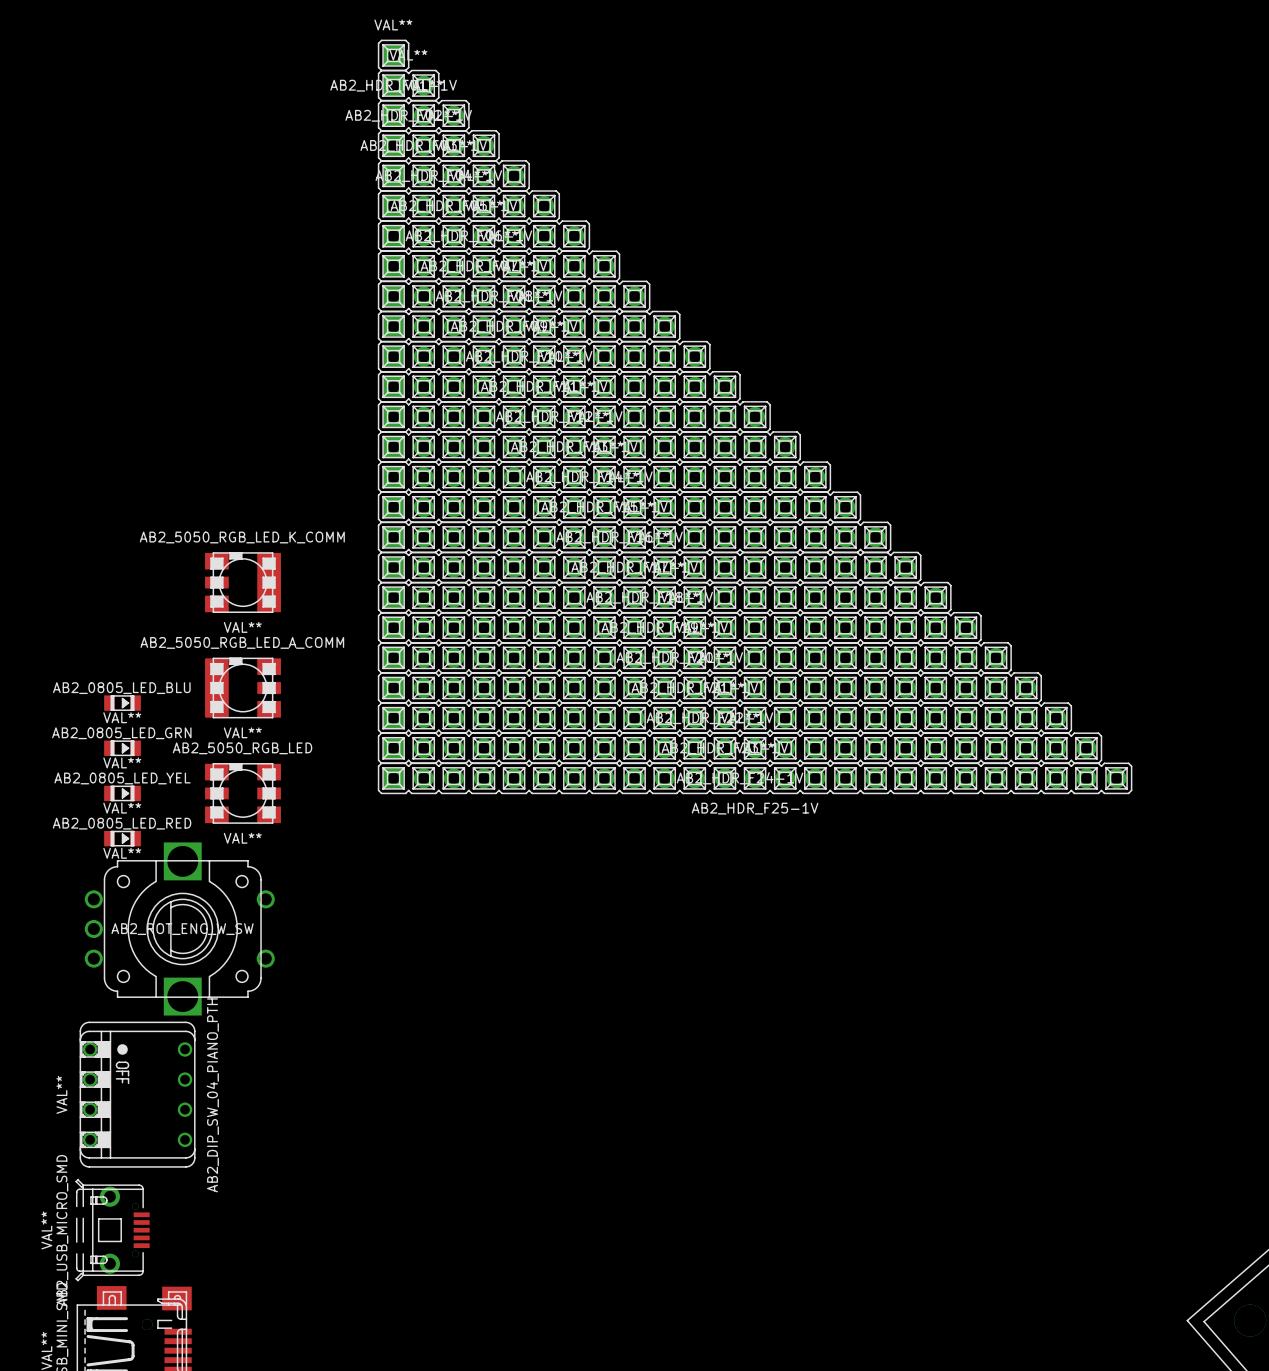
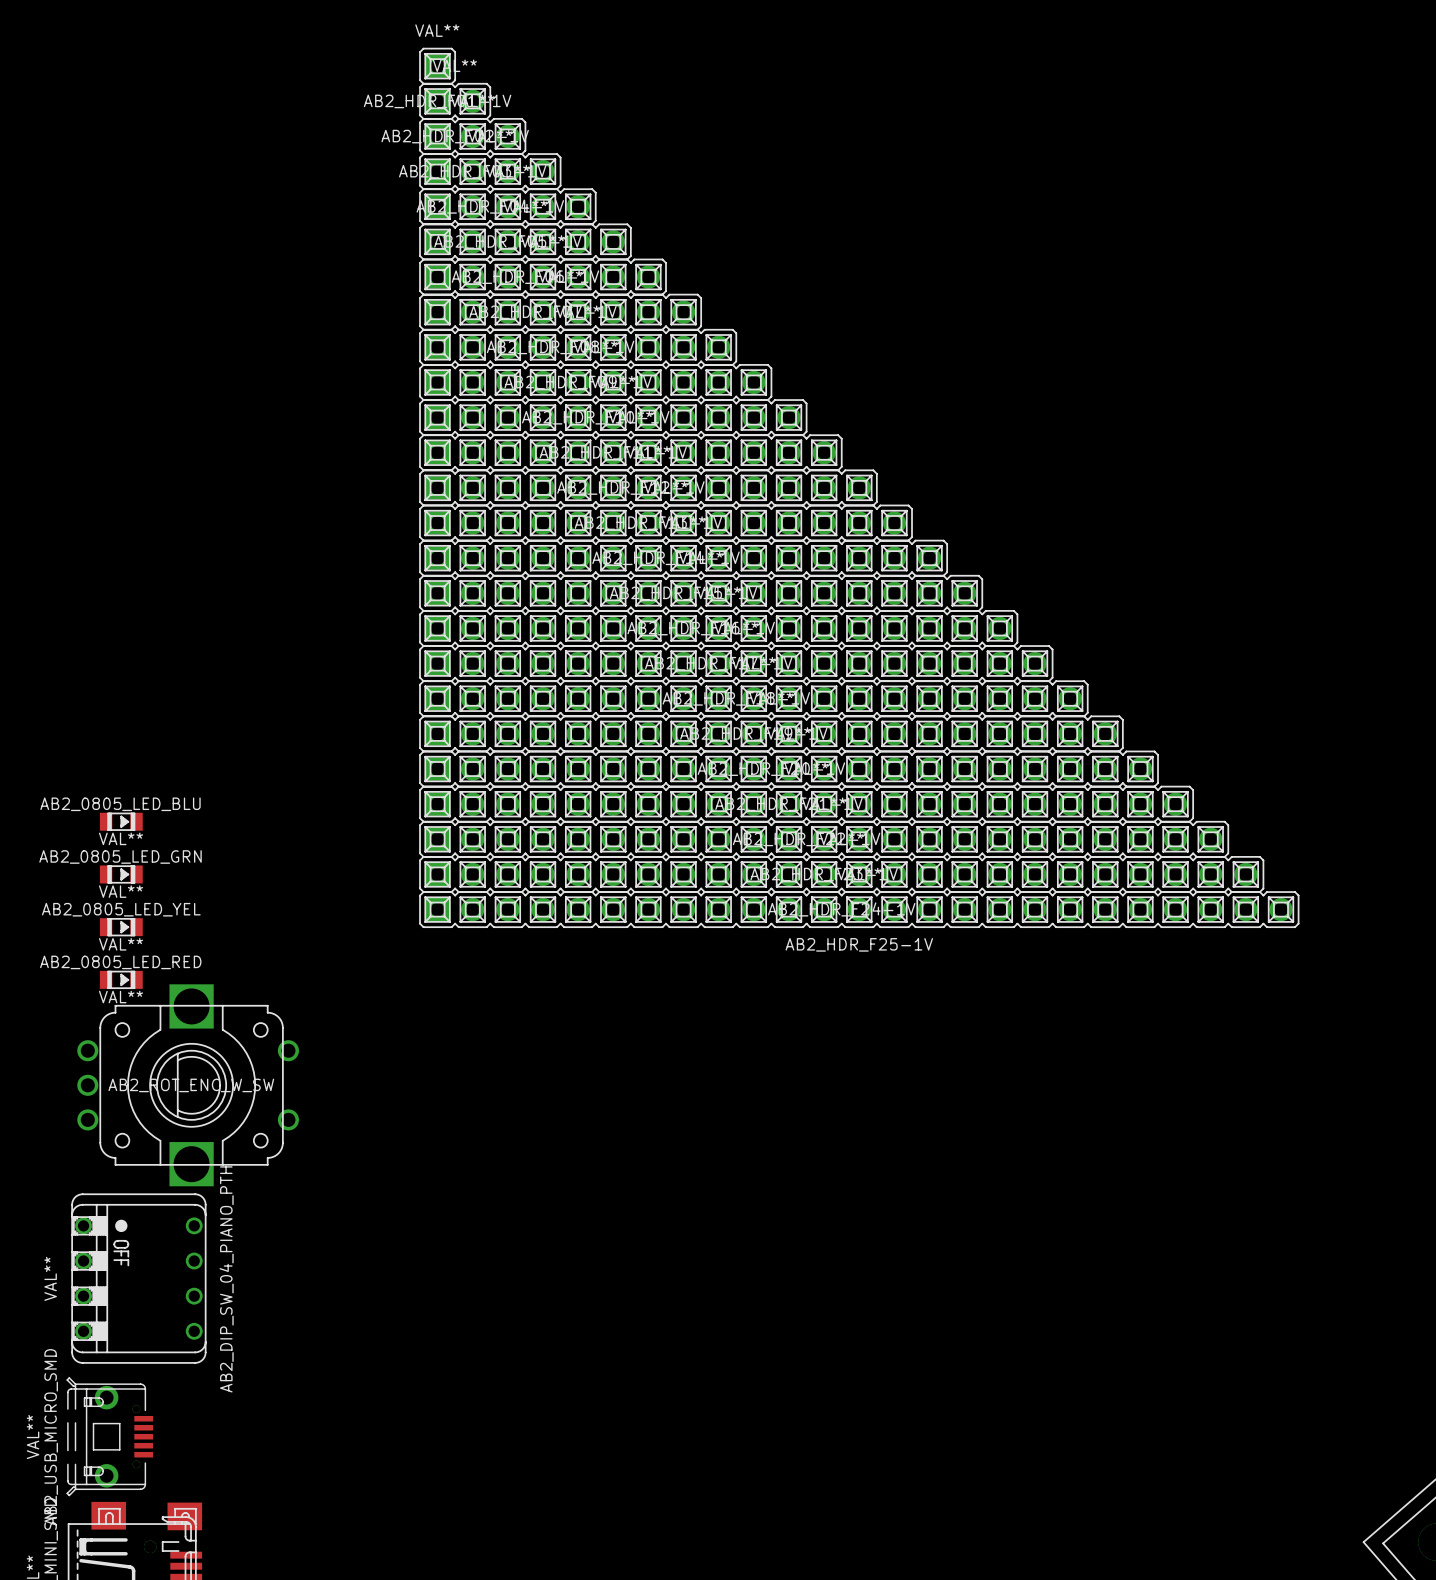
AB2_5050_RGB_LED_K_COMM: VAL** (243, 582) -> none
AB2_5050_RGB_LED_A_COMM: VAL** (243, 688) -> none
AB2_5050_RGB_LED: VAL** (243, 793) -> none

